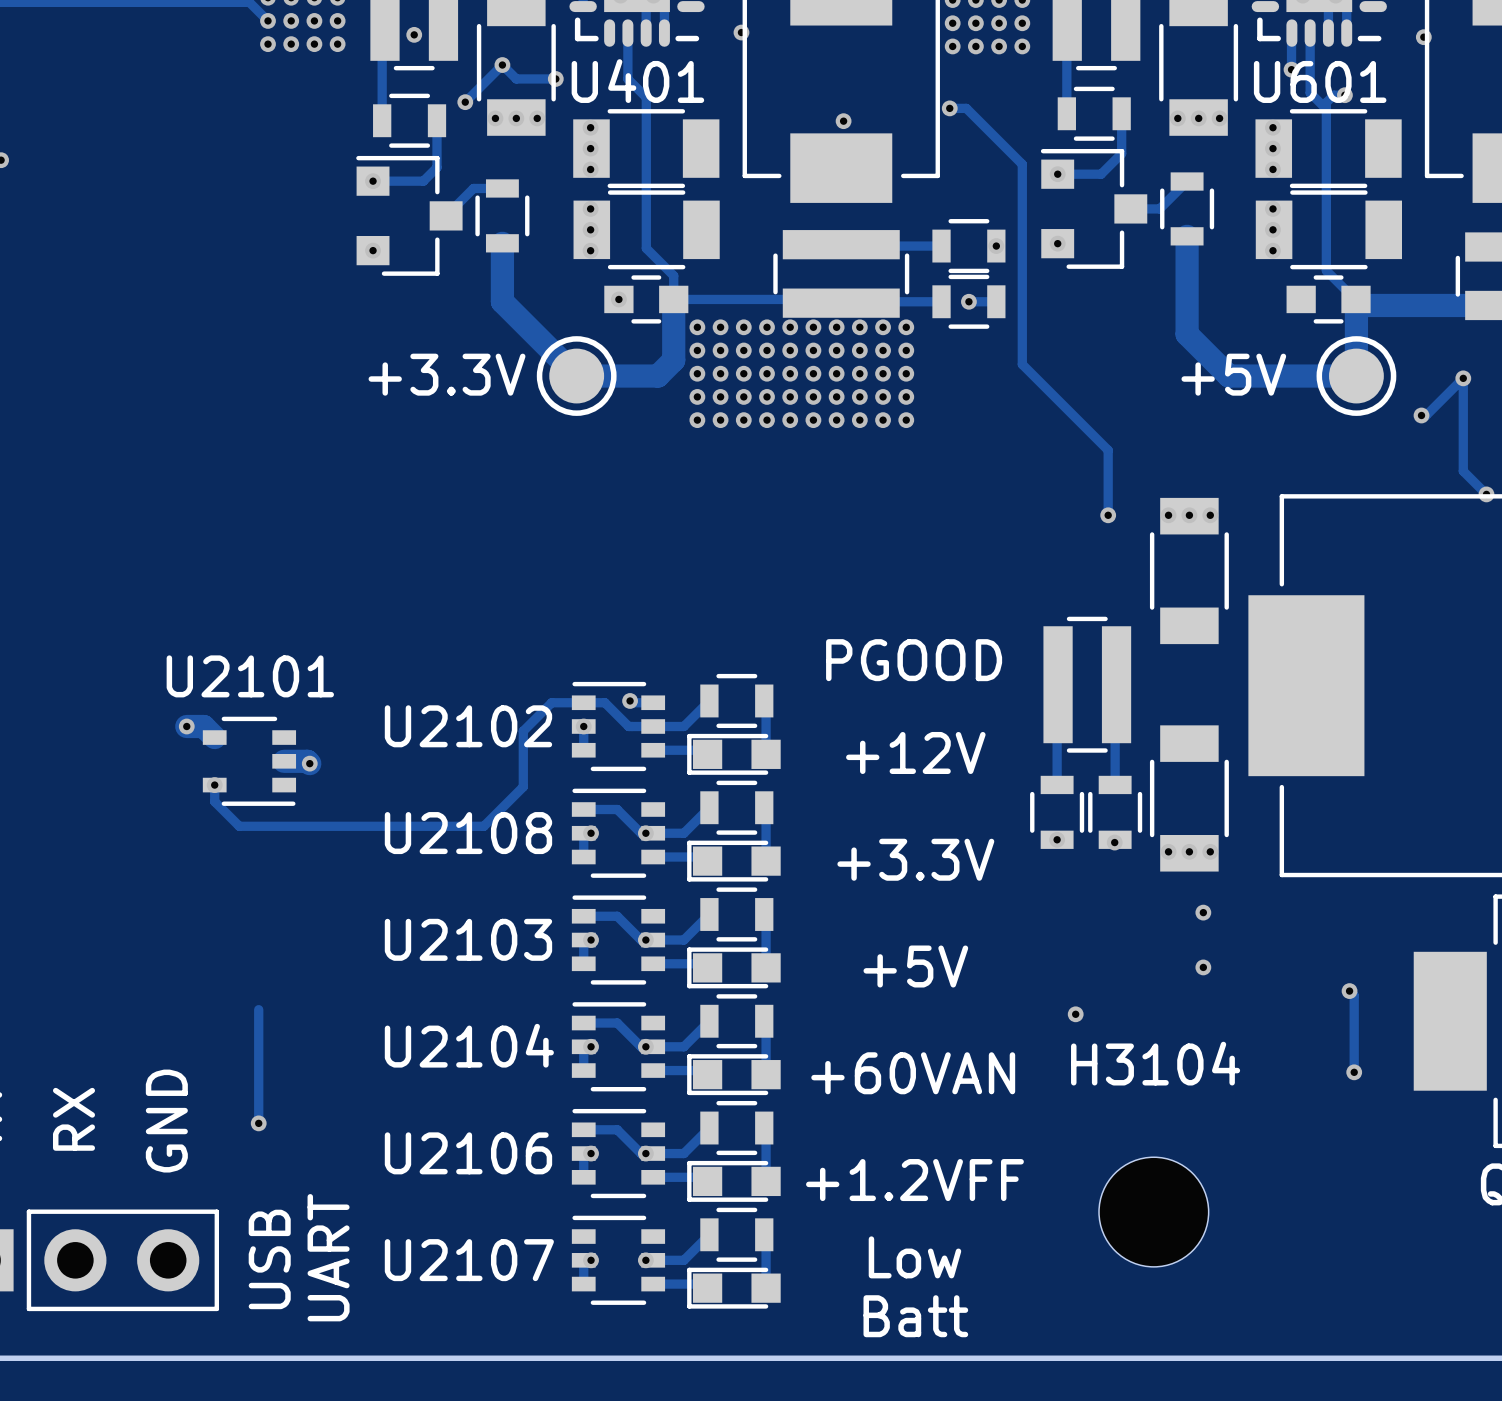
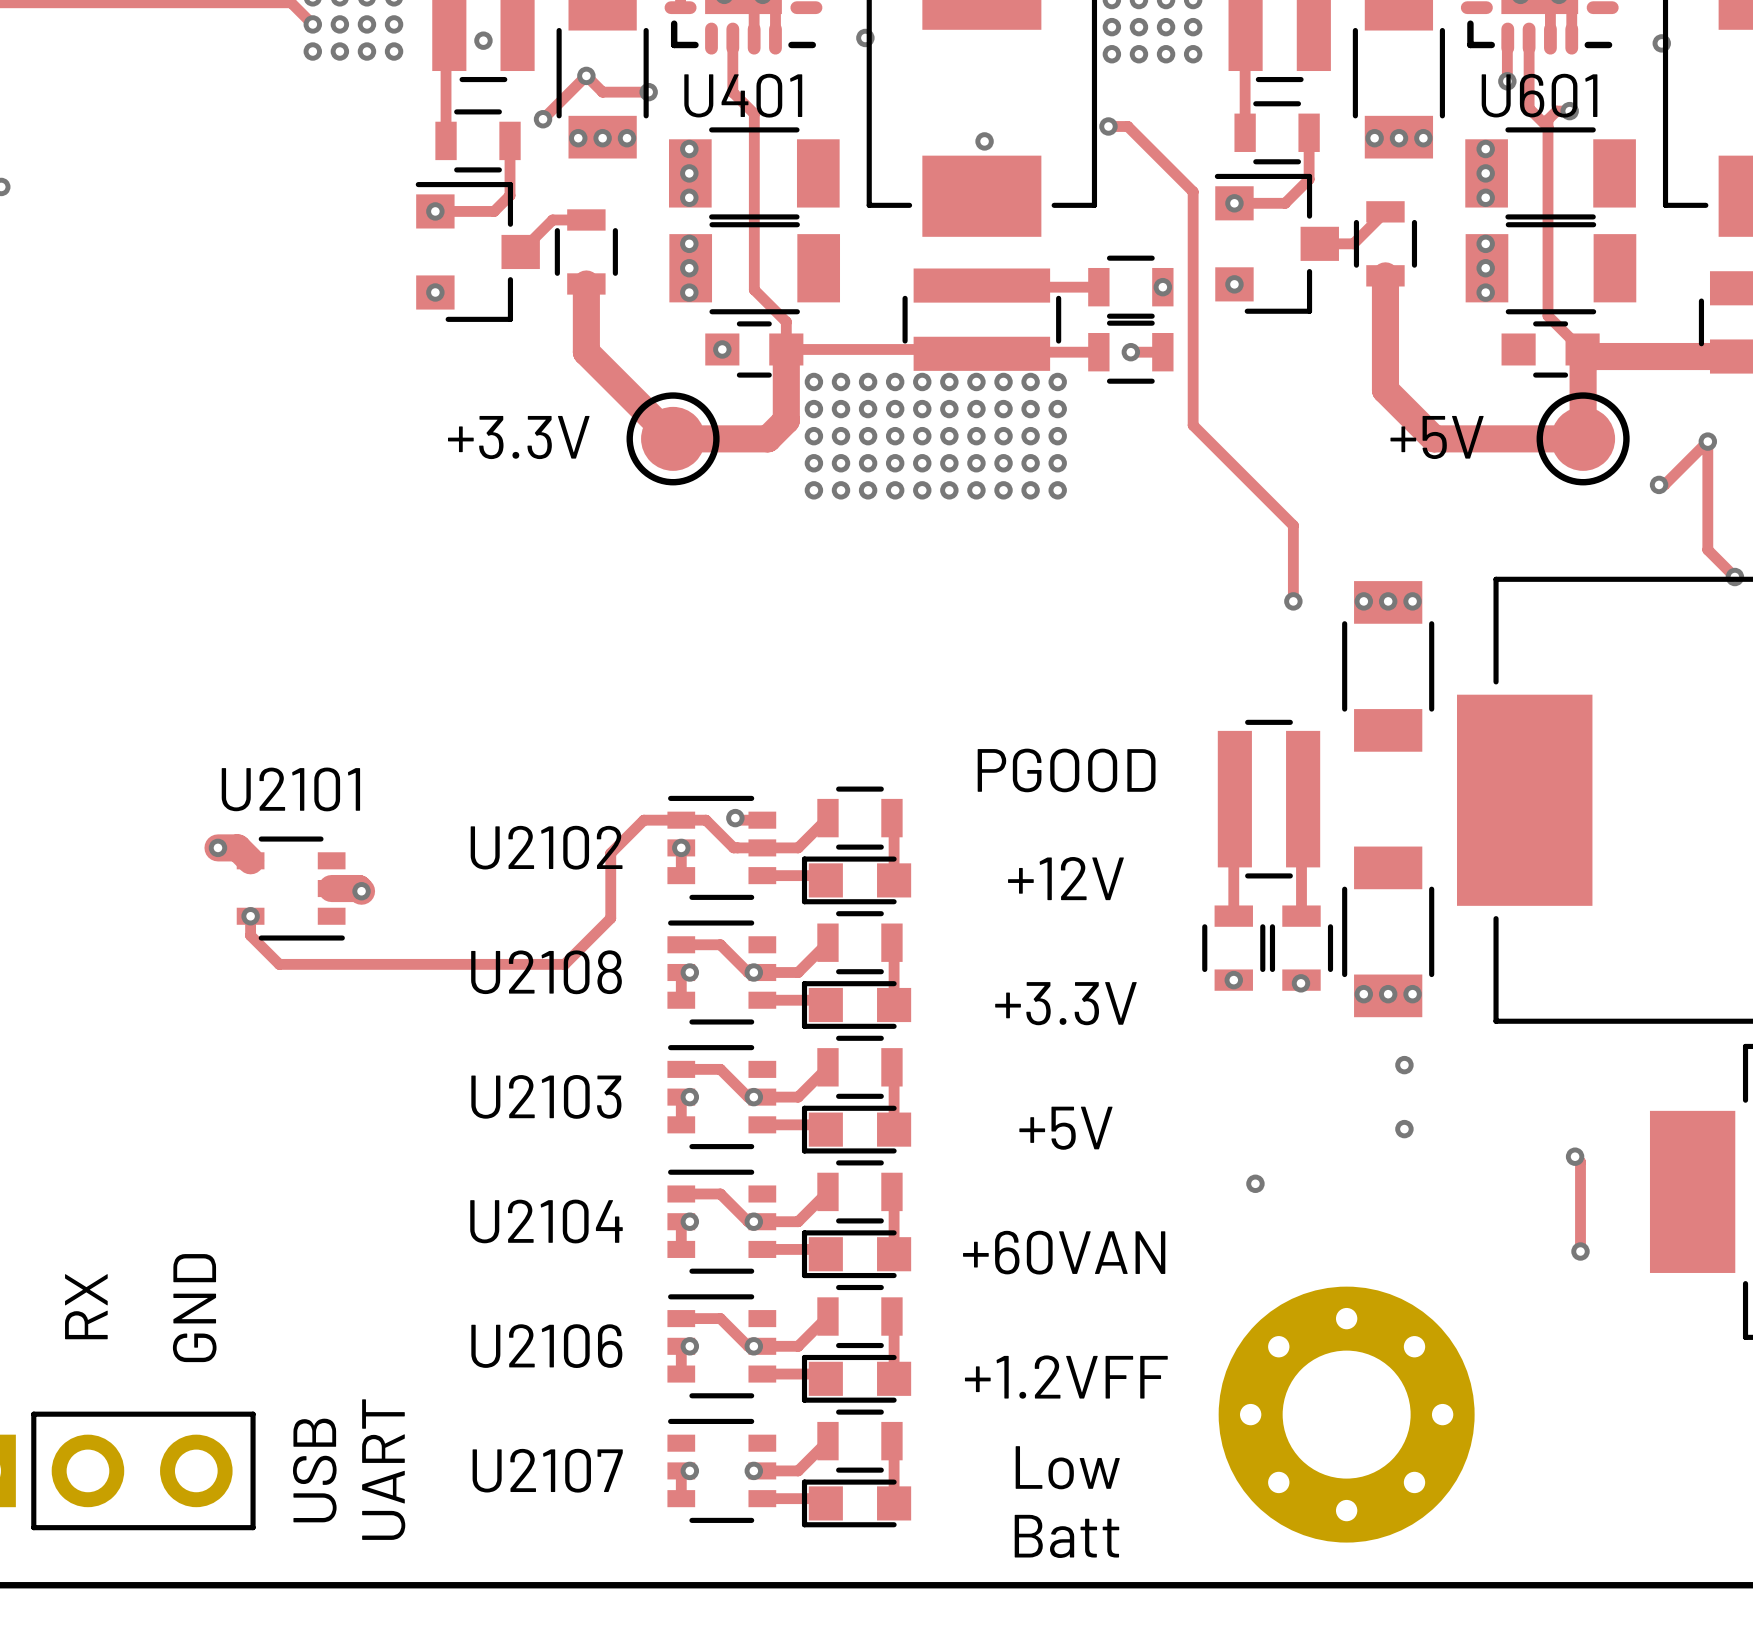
track: (258, 1009) (258, 1123) -> none
via: (258, 1123) -> none
H3104: (1153, 1212) -> none
part: none -> (1346, 1414)

